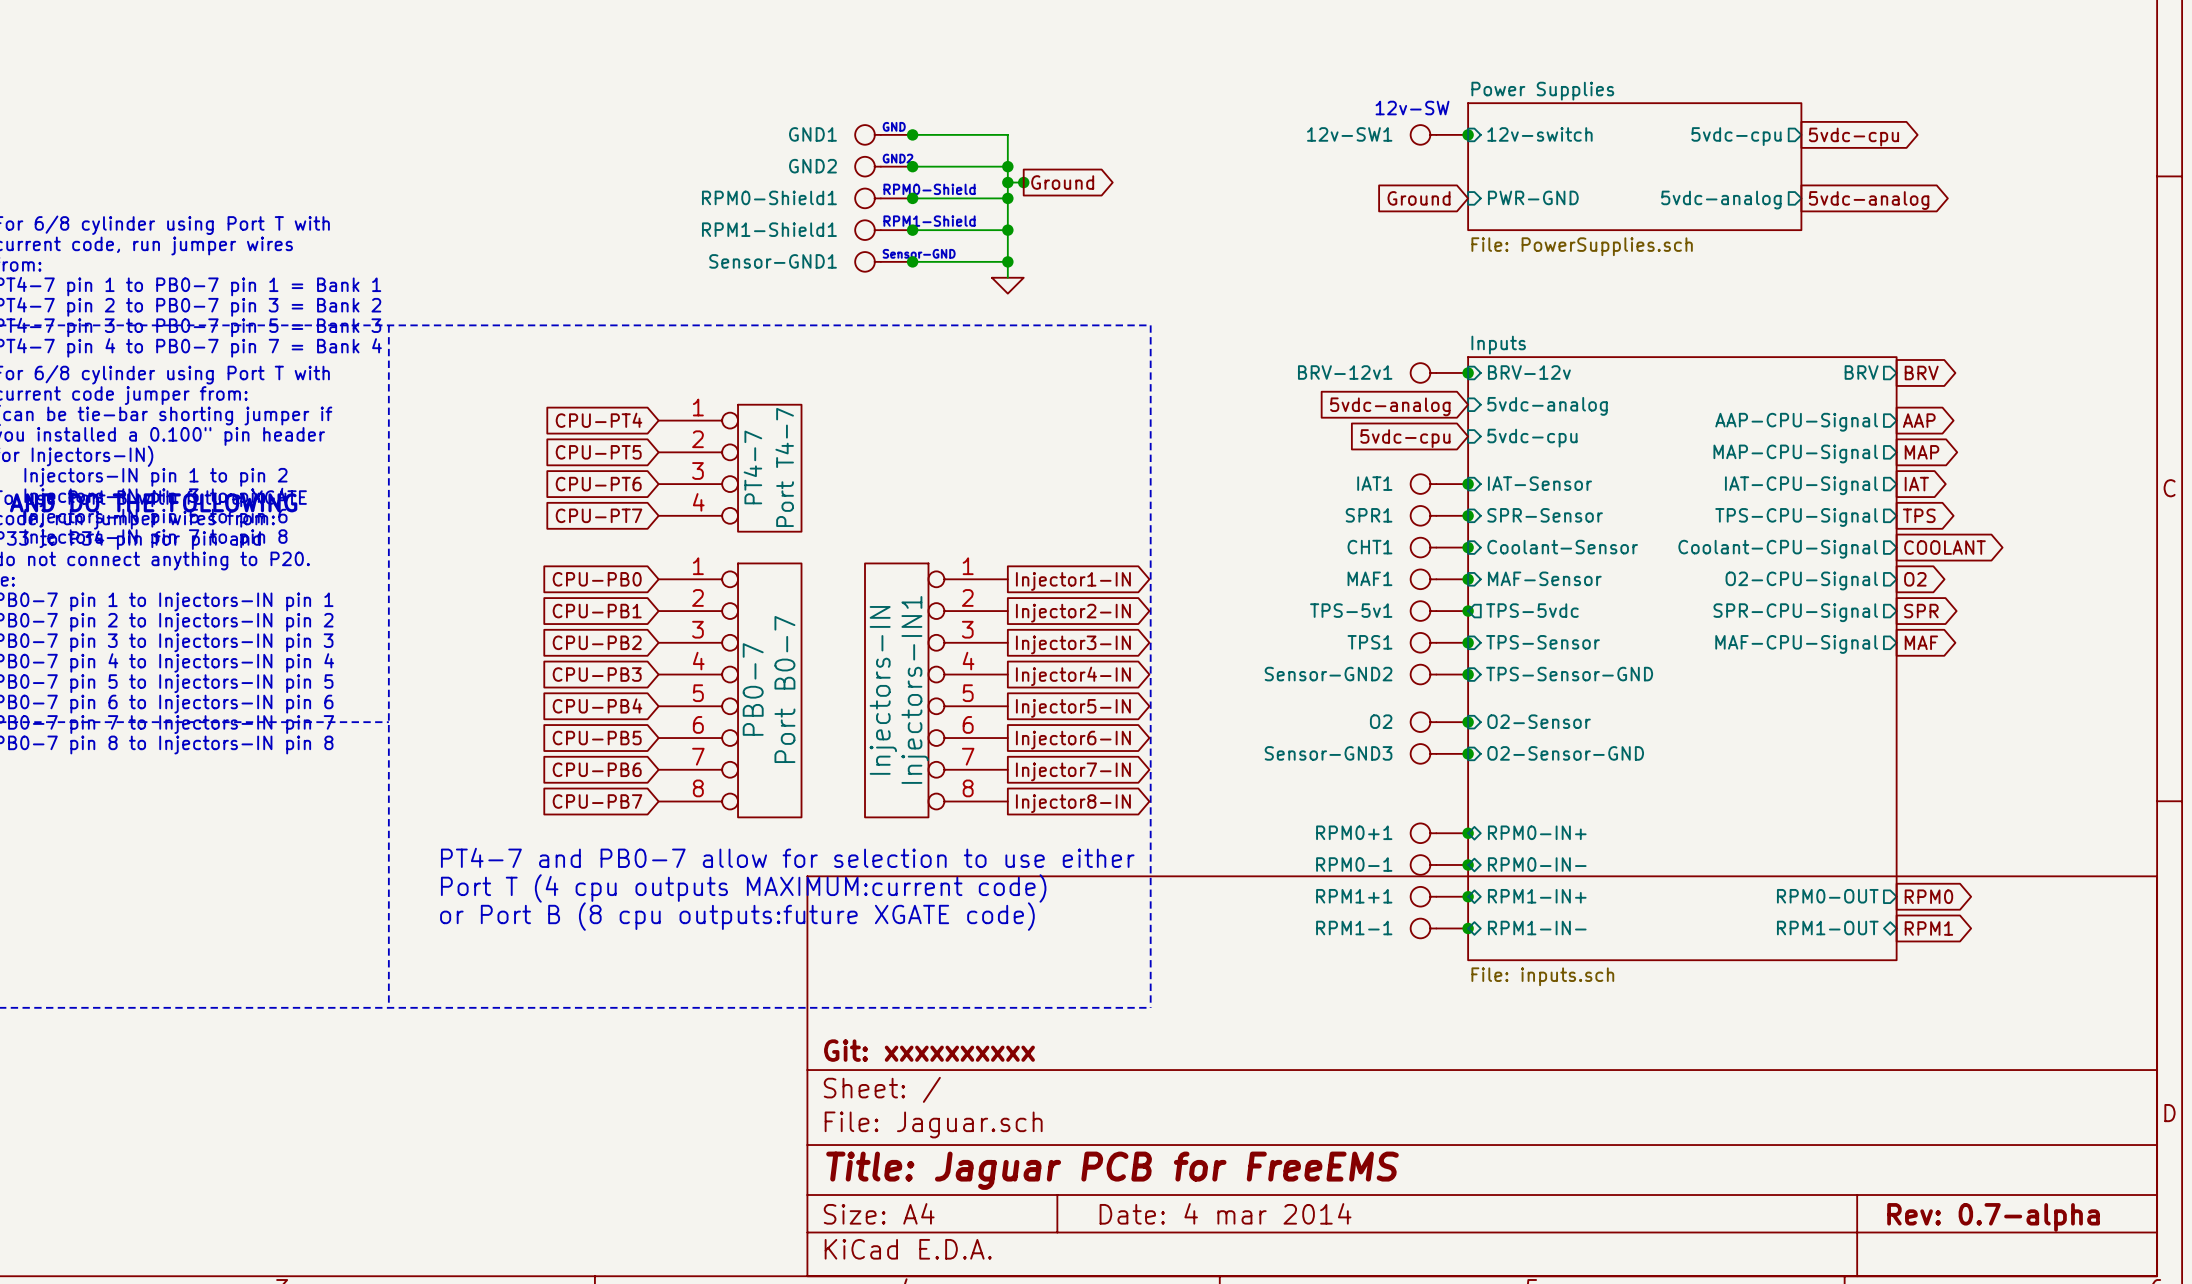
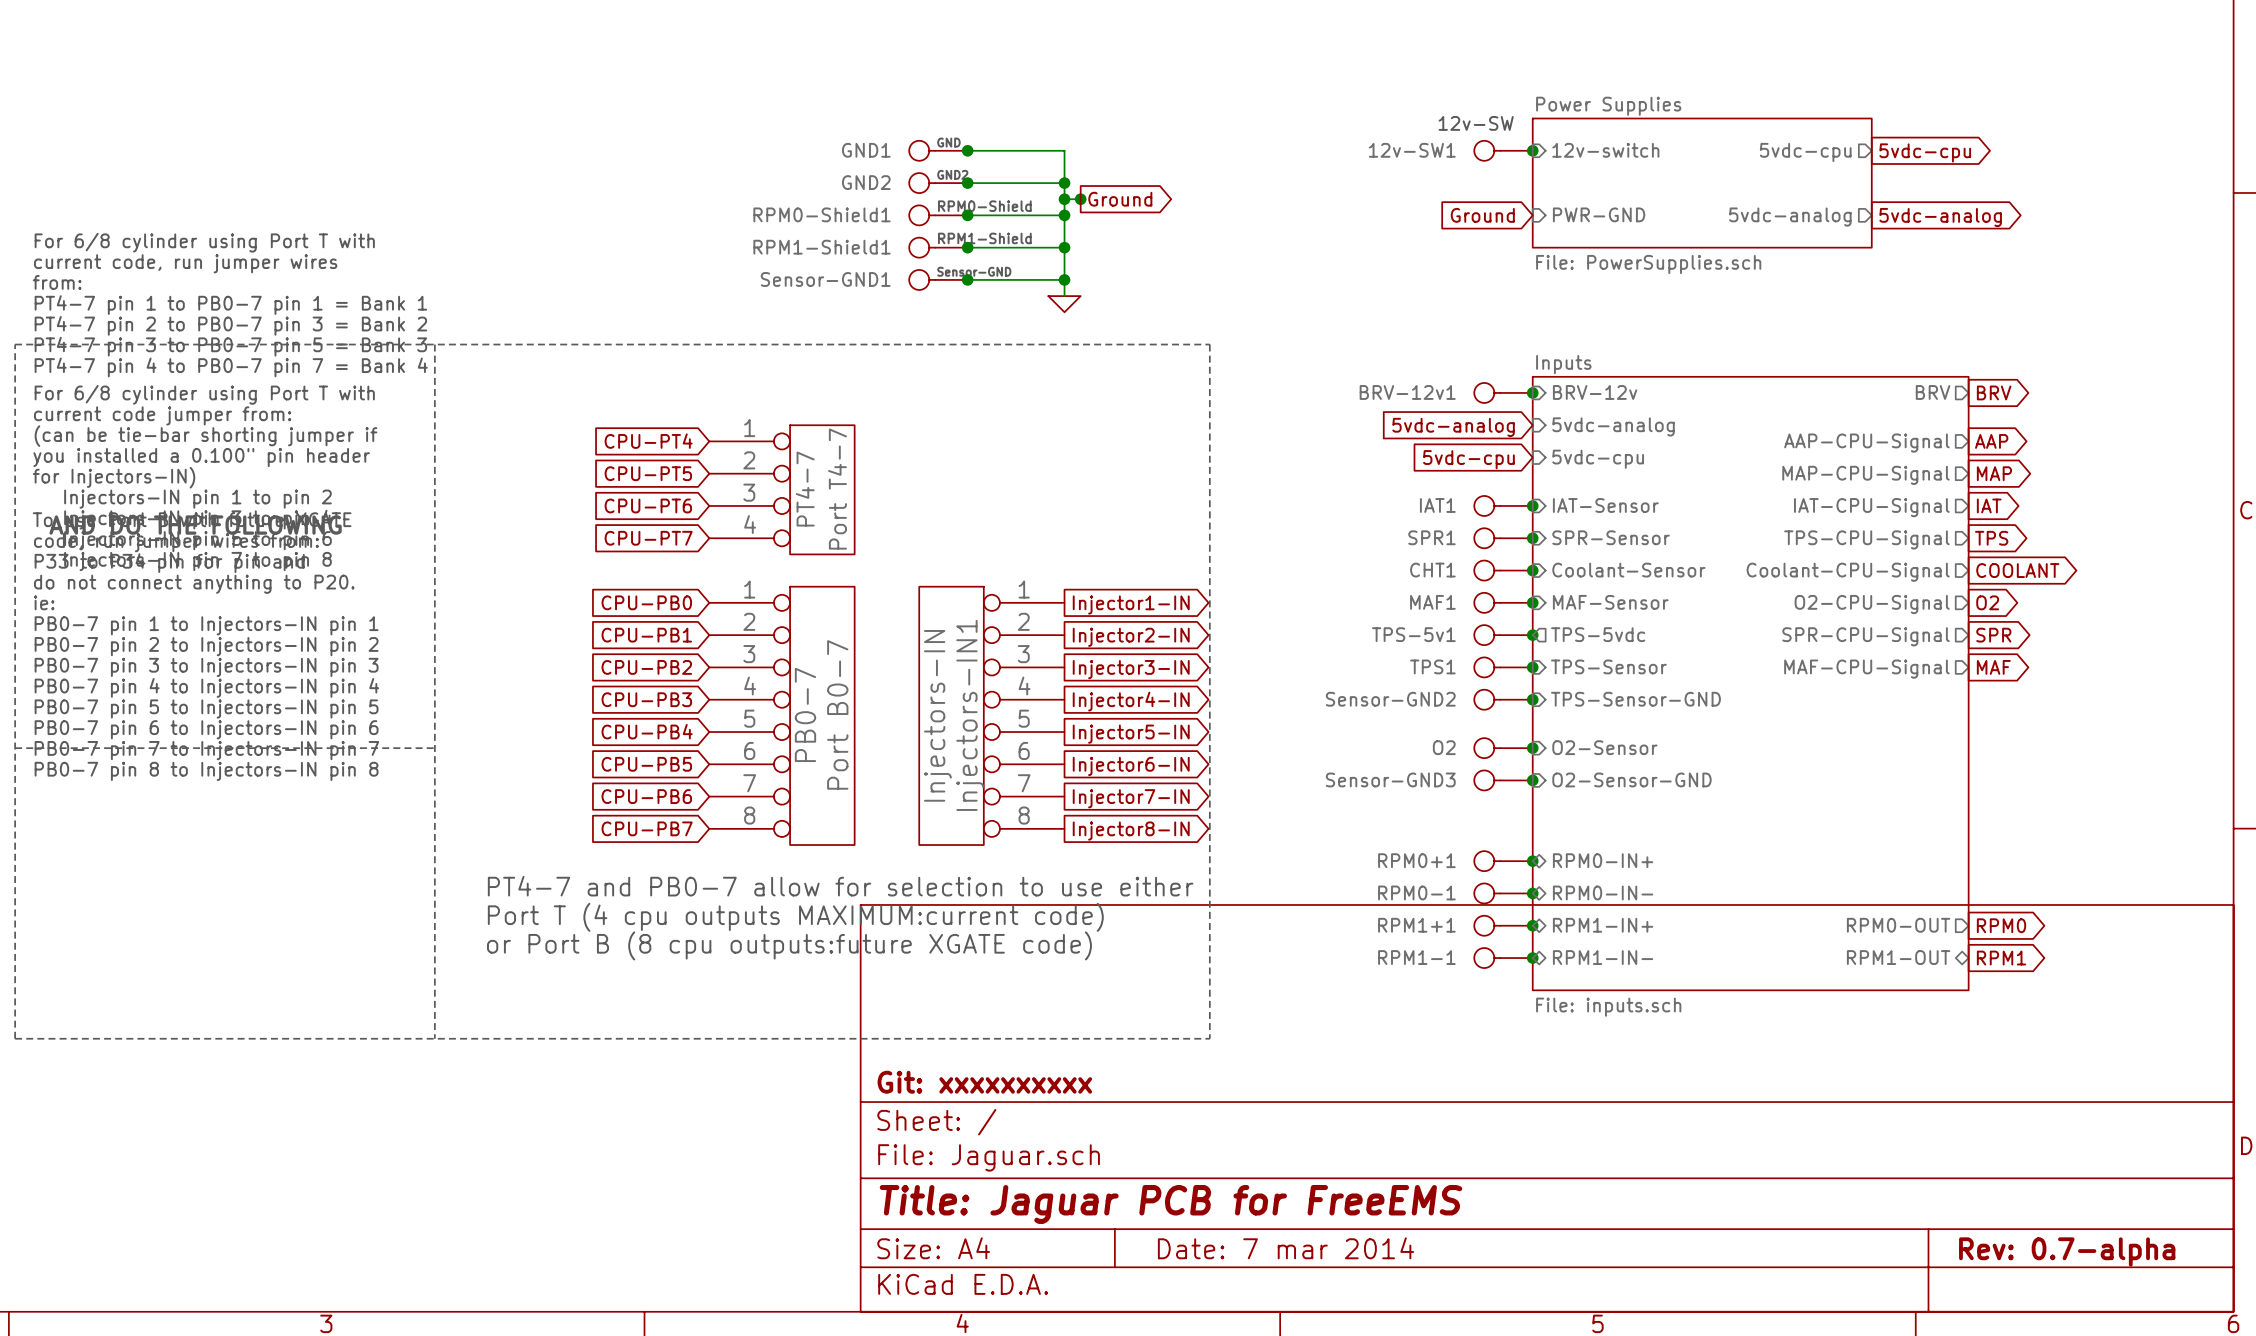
title block: Date: 4 mar 2014 (1225, 1213) -> Date: 7 mar 2014 (1285, 1248)

